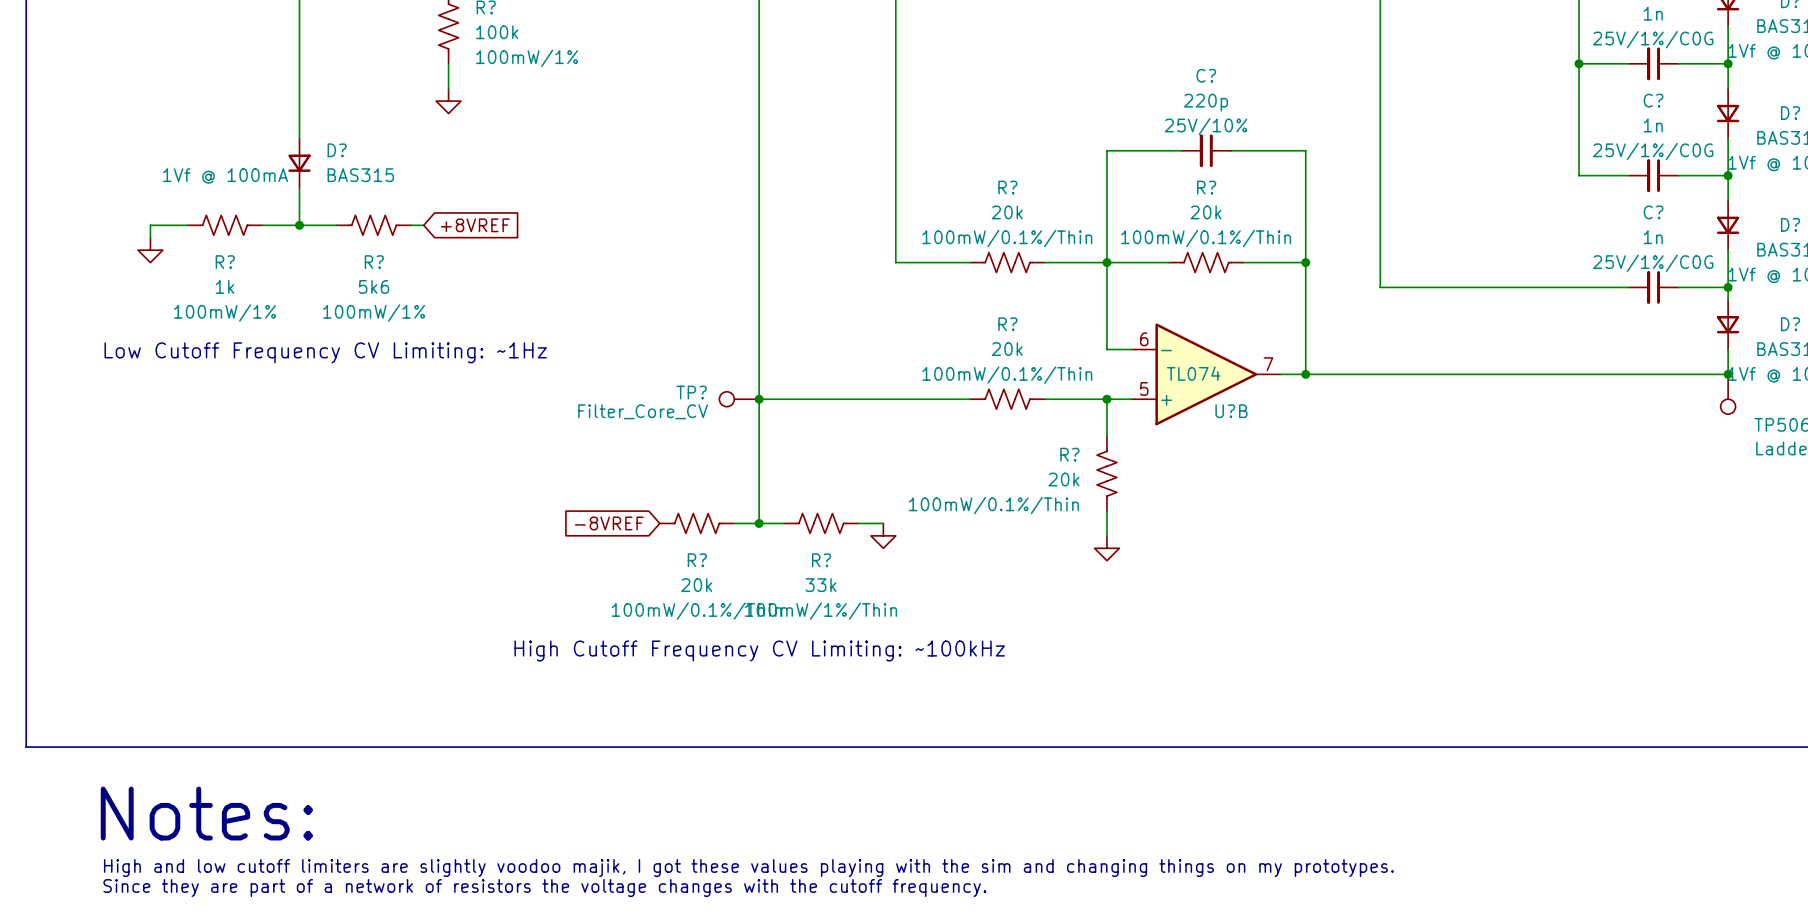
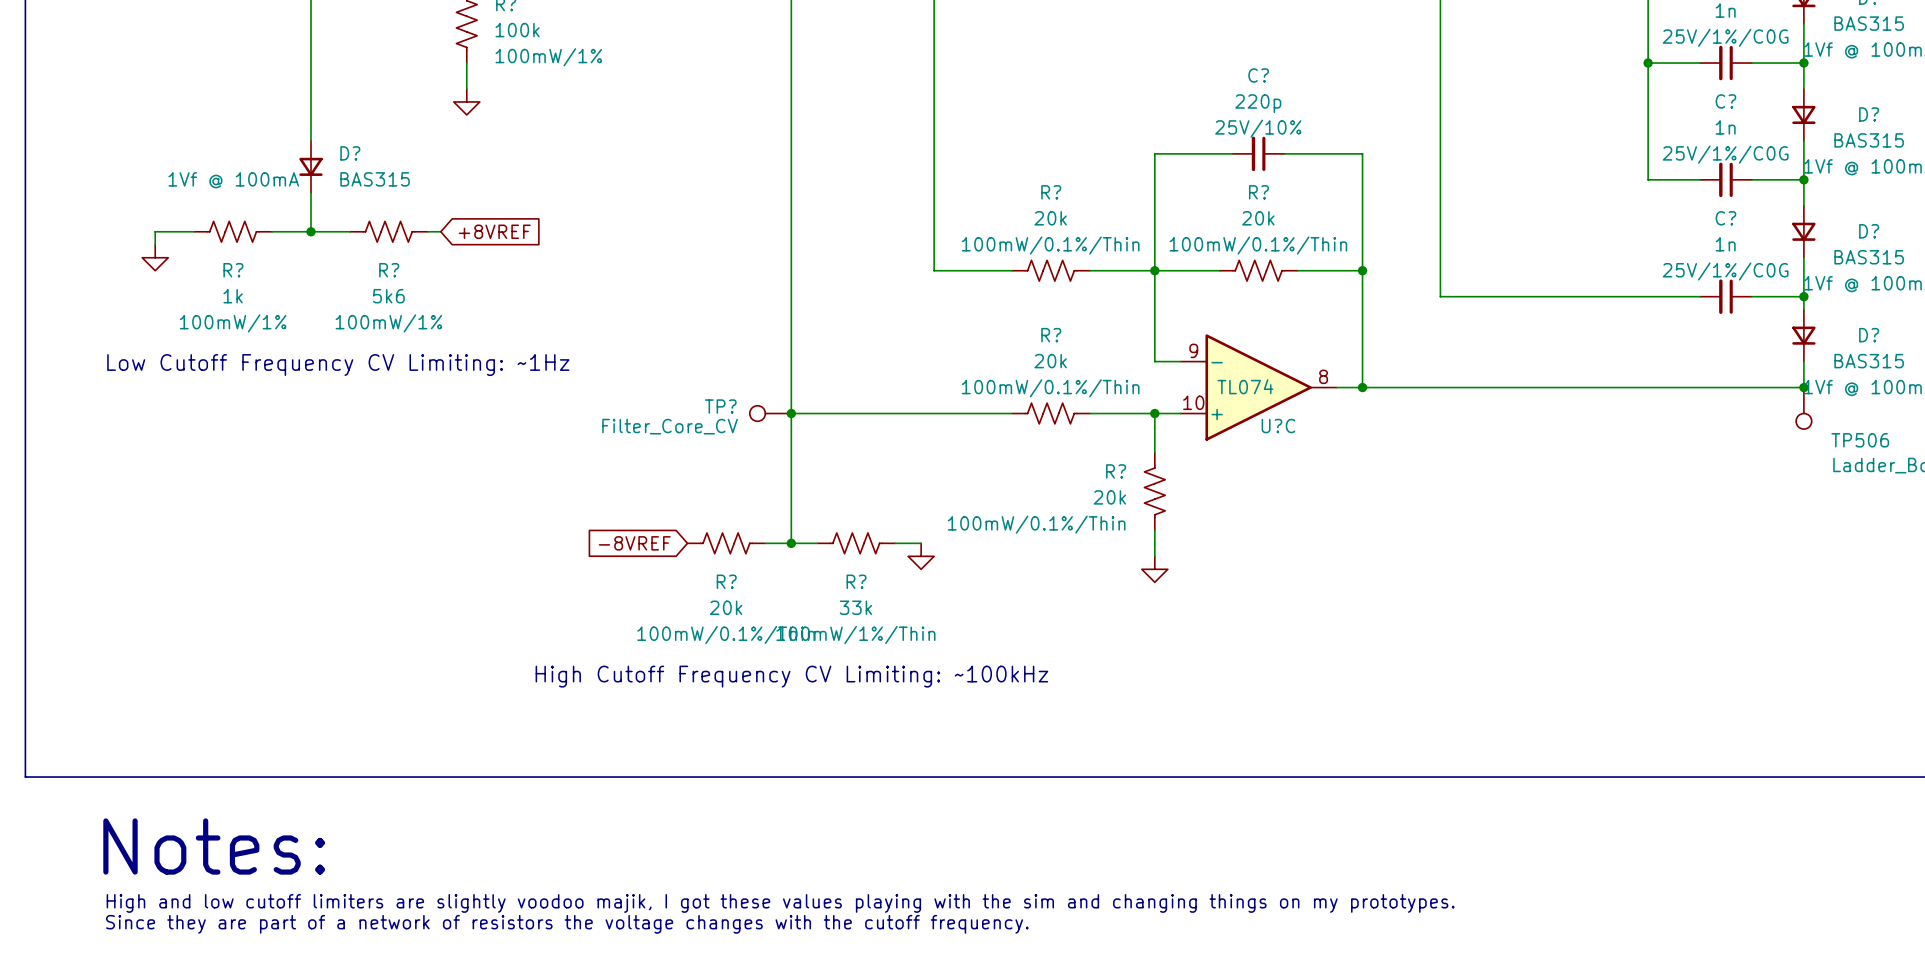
U?B pin number: 6 (1144, 339) -> 9 (1193, 350)
U?B pin number: 7 (1268, 364) -> 8 (1323, 376)
U?B pin number: 5 (1144, 388) -> 10 (1193, 402)
U?B name: U?B (1231, 411) -> U?C (1278, 426)

